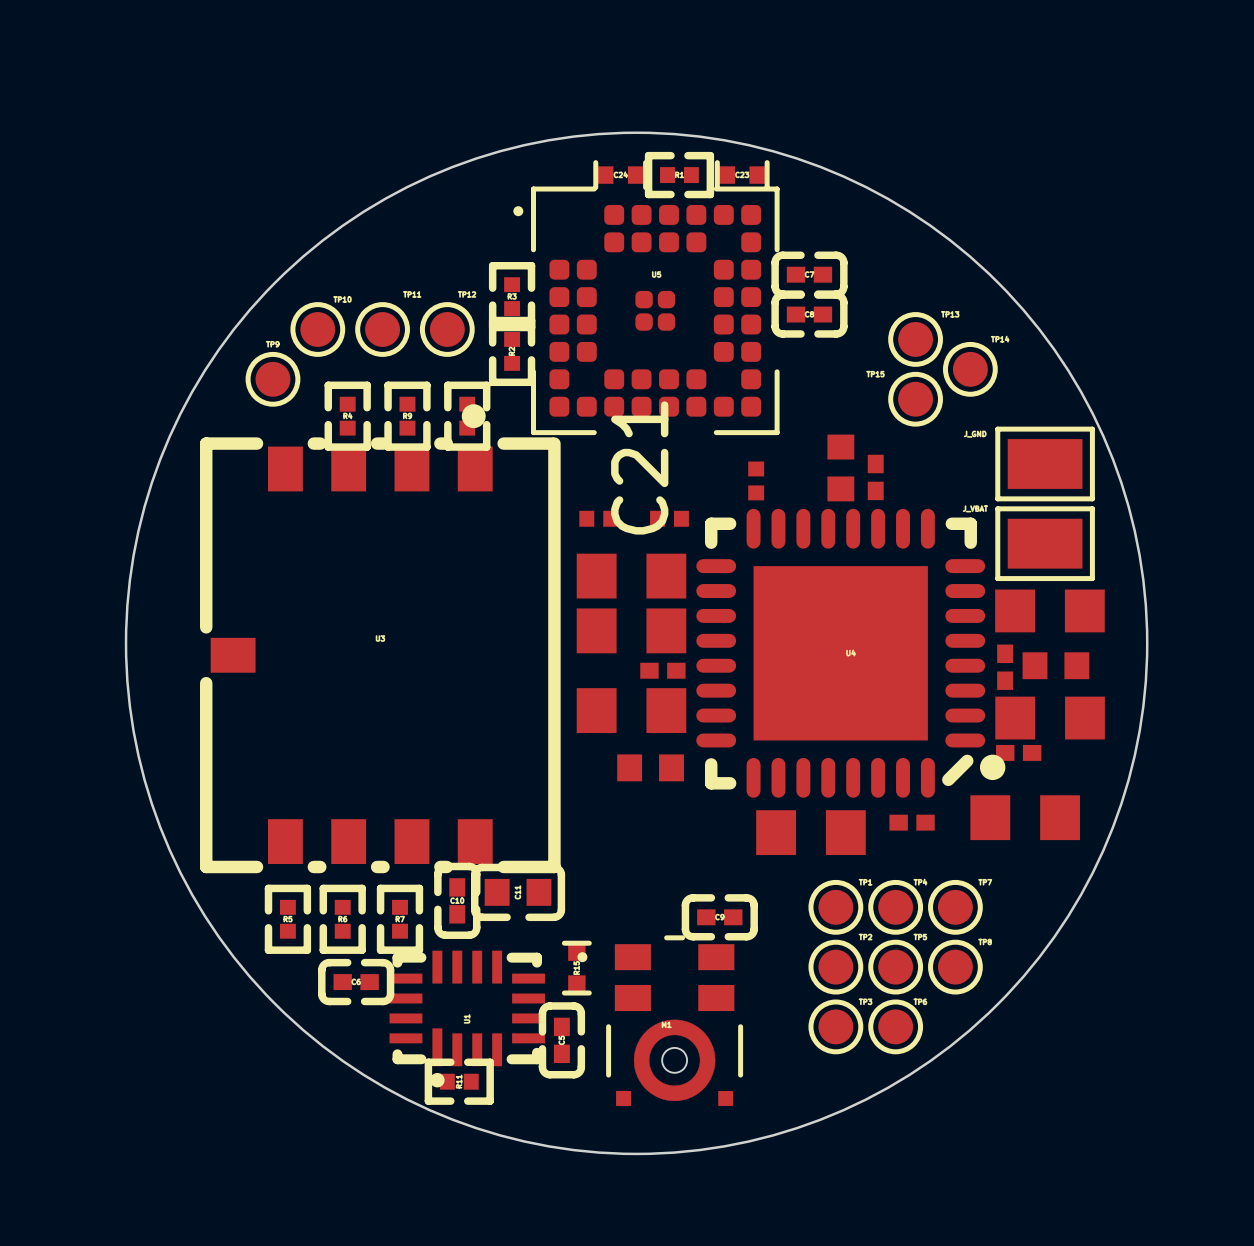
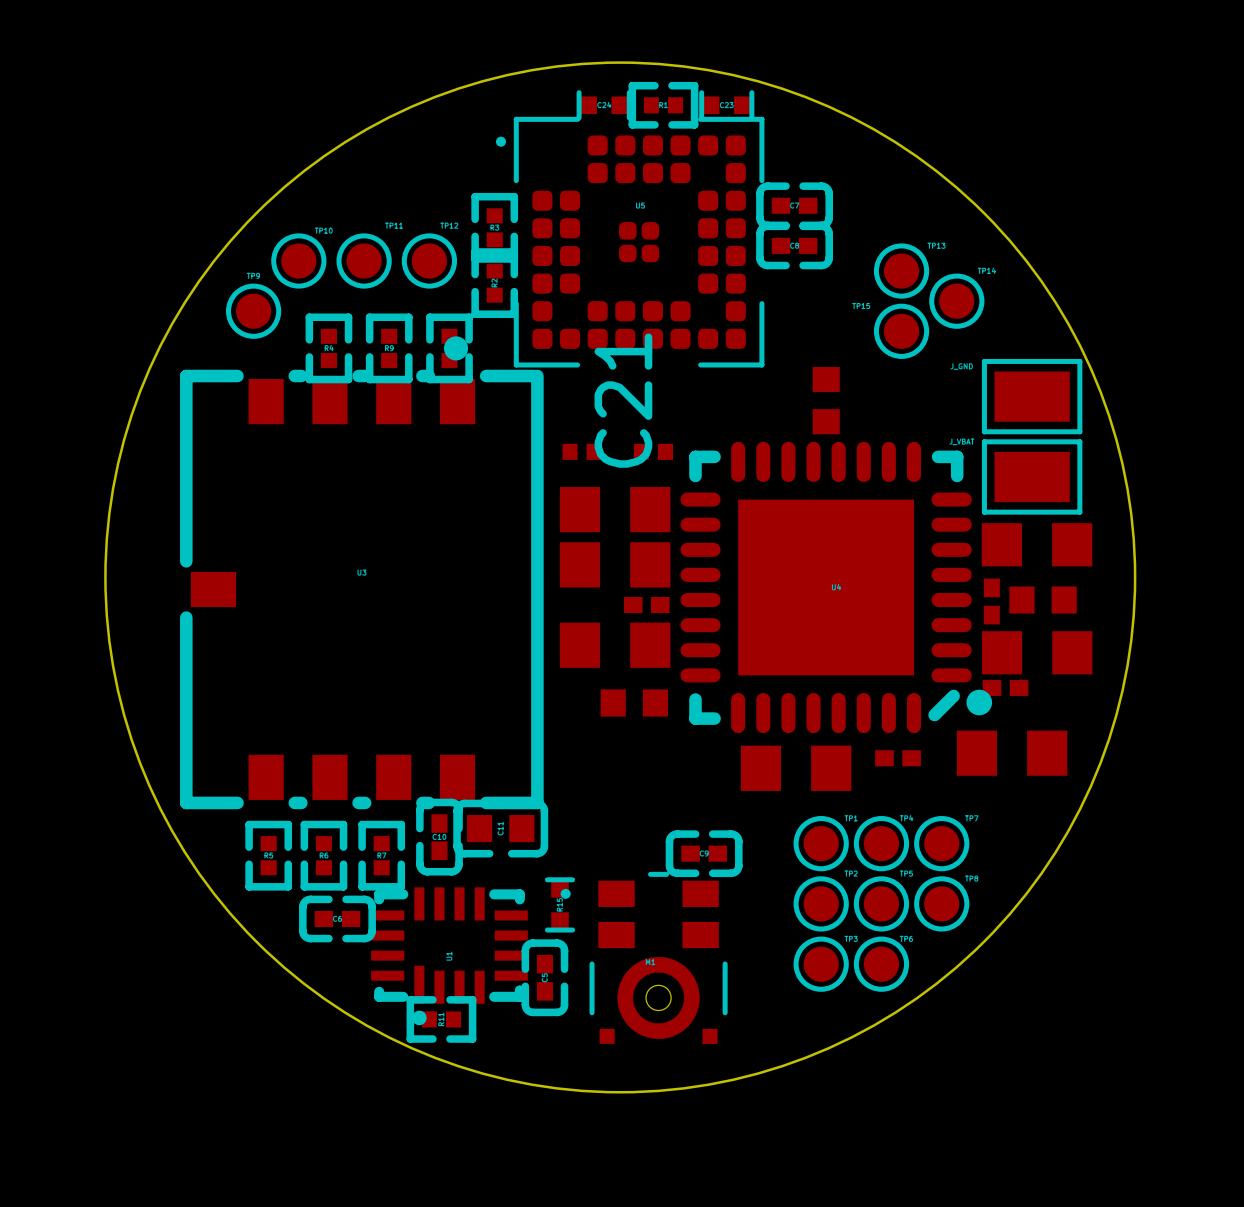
part: (875, 477) -> none
part: (756, 480) -> none

